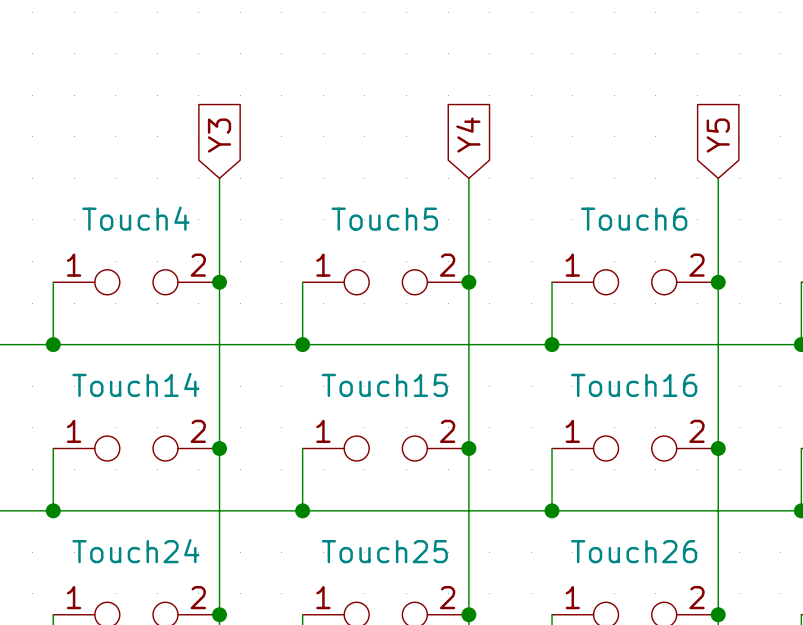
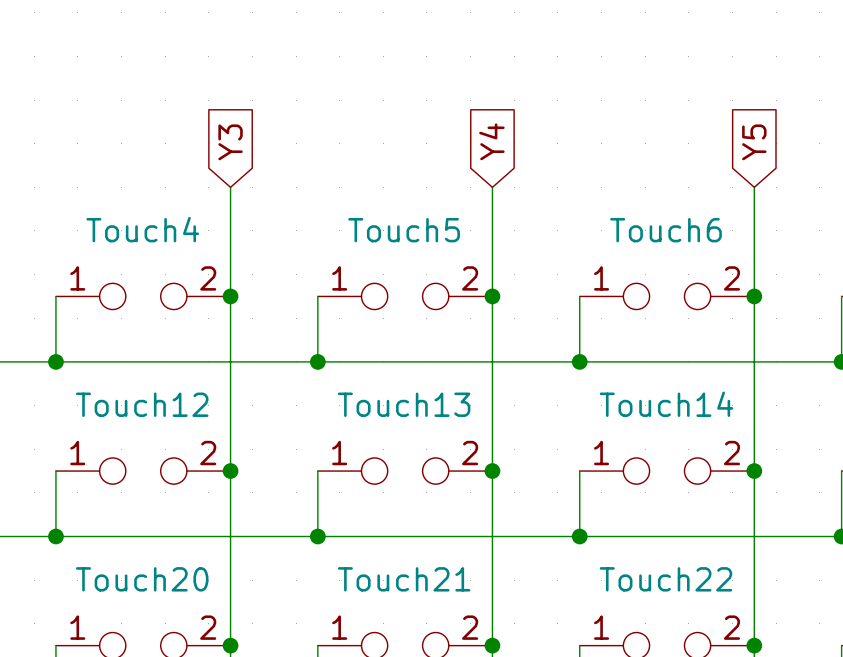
Touch14 name: Touch14 (135, 384) -> Touch12 (142, 404)
Touch15 name: Touch15 (384, 385) -> Touch13 (404, 404)
Touch16 name: Touch16 (634, 385) -> Touch14 (666, 404)
Touch24 name: Touch24 (135, 551) -> Touch20 (142, 579)
Touch25 name: Touch25 (384, 551) -> Touch21 (404, 579)
Touch26 name: Touch26 (634, 551) -> Touch22 (665, 579)

